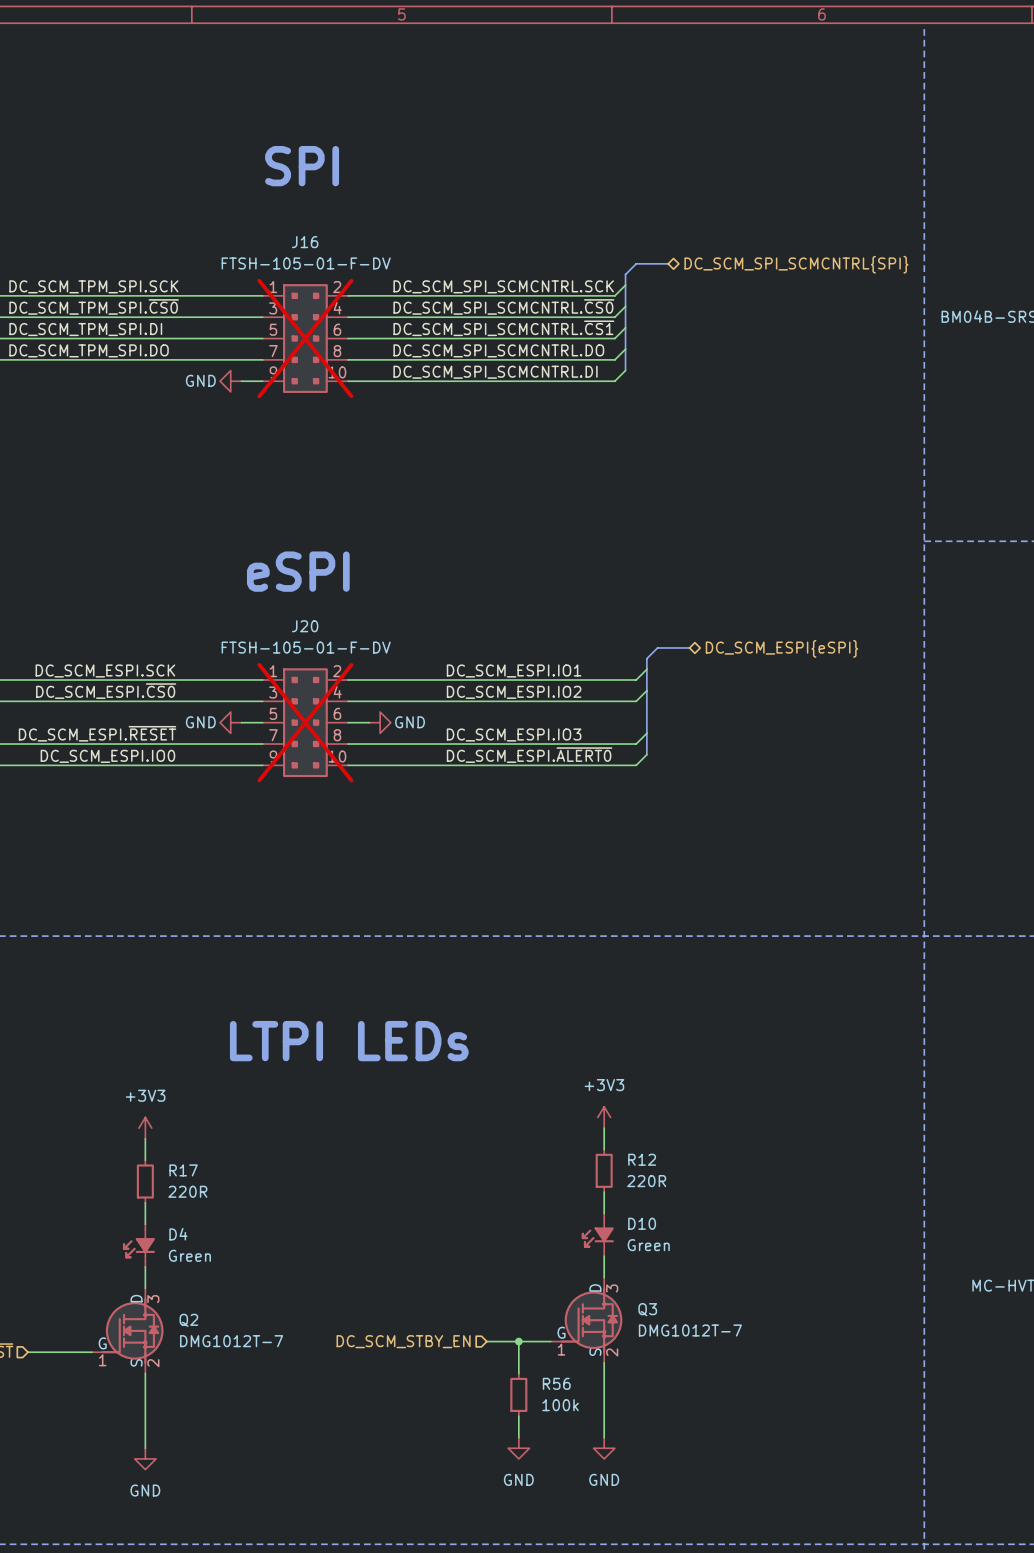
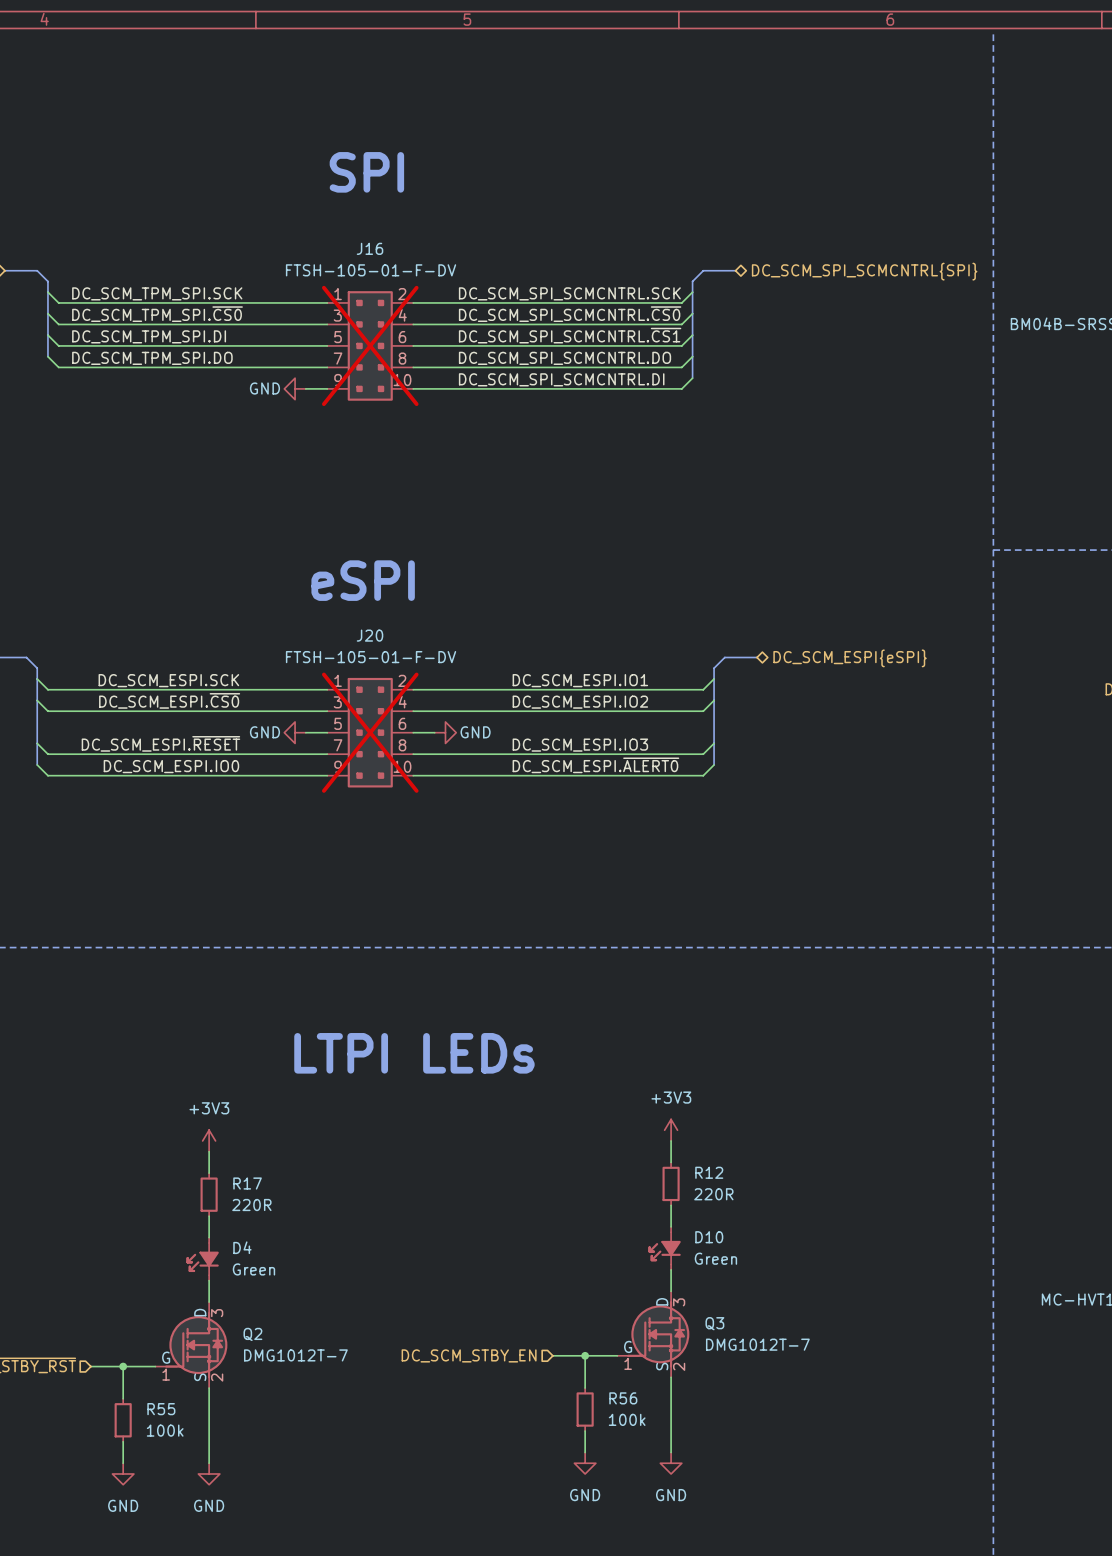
wire: none -> (123, 1366) (123, 1398)
junction: none -> (123, 1366)
R55: none -> (123, 1420)
wire: none -> (123, 1441) (123, 1463)
power symbol: none -> GND (123, 1473)

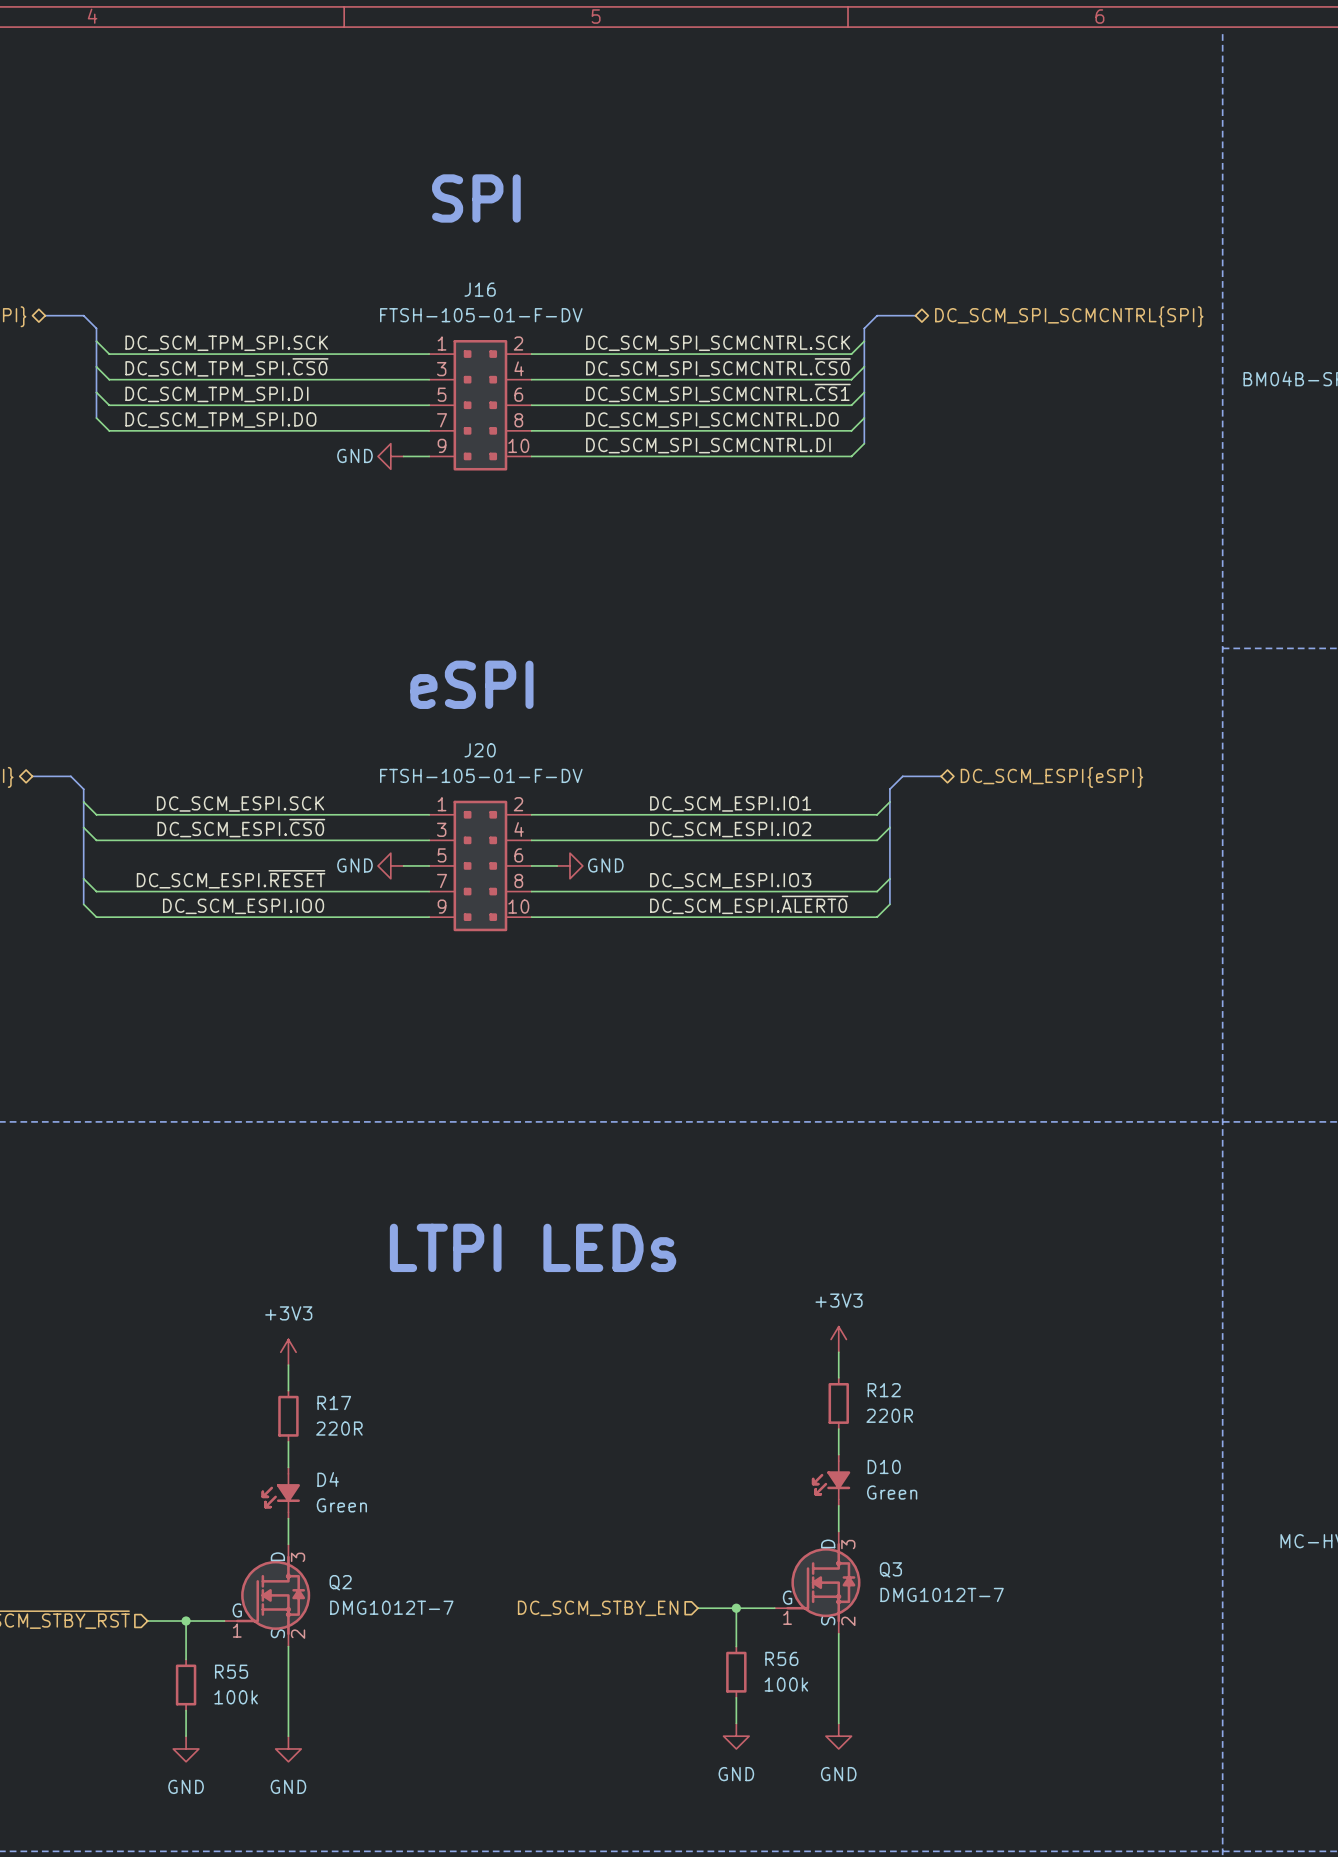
J16 do-not-place cross: (370, 345) -> none
J20 do-not-place cross: (370, 732) -> none

